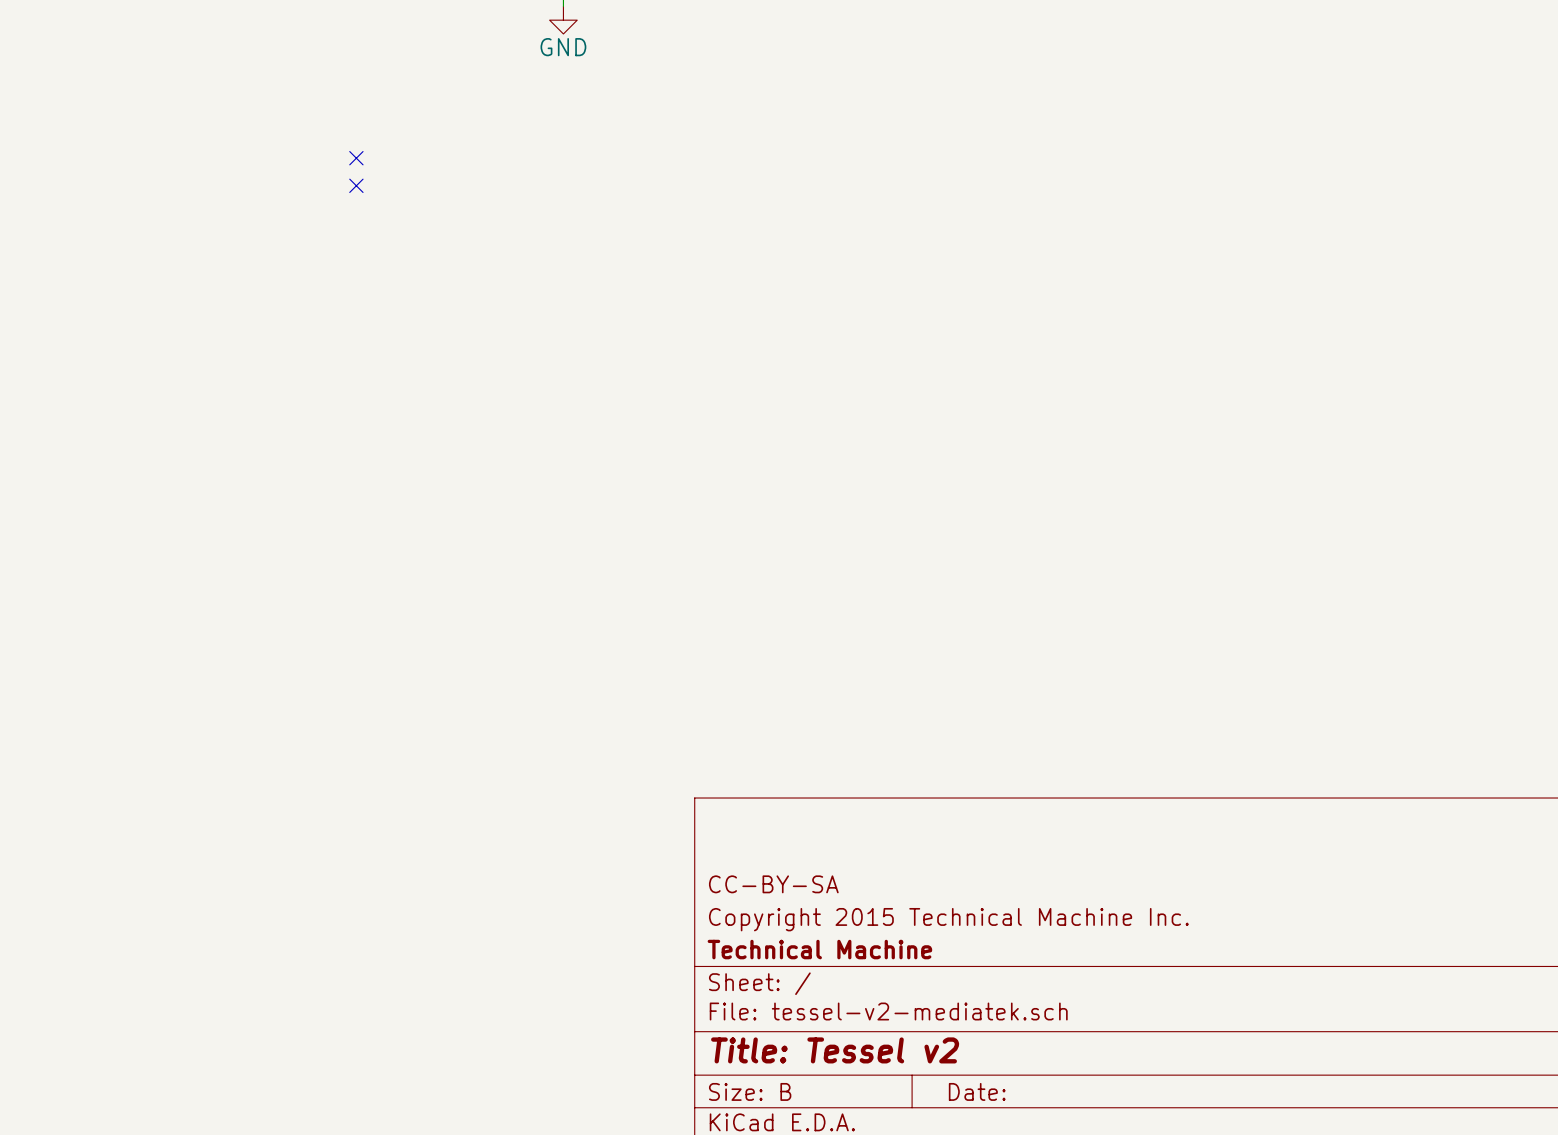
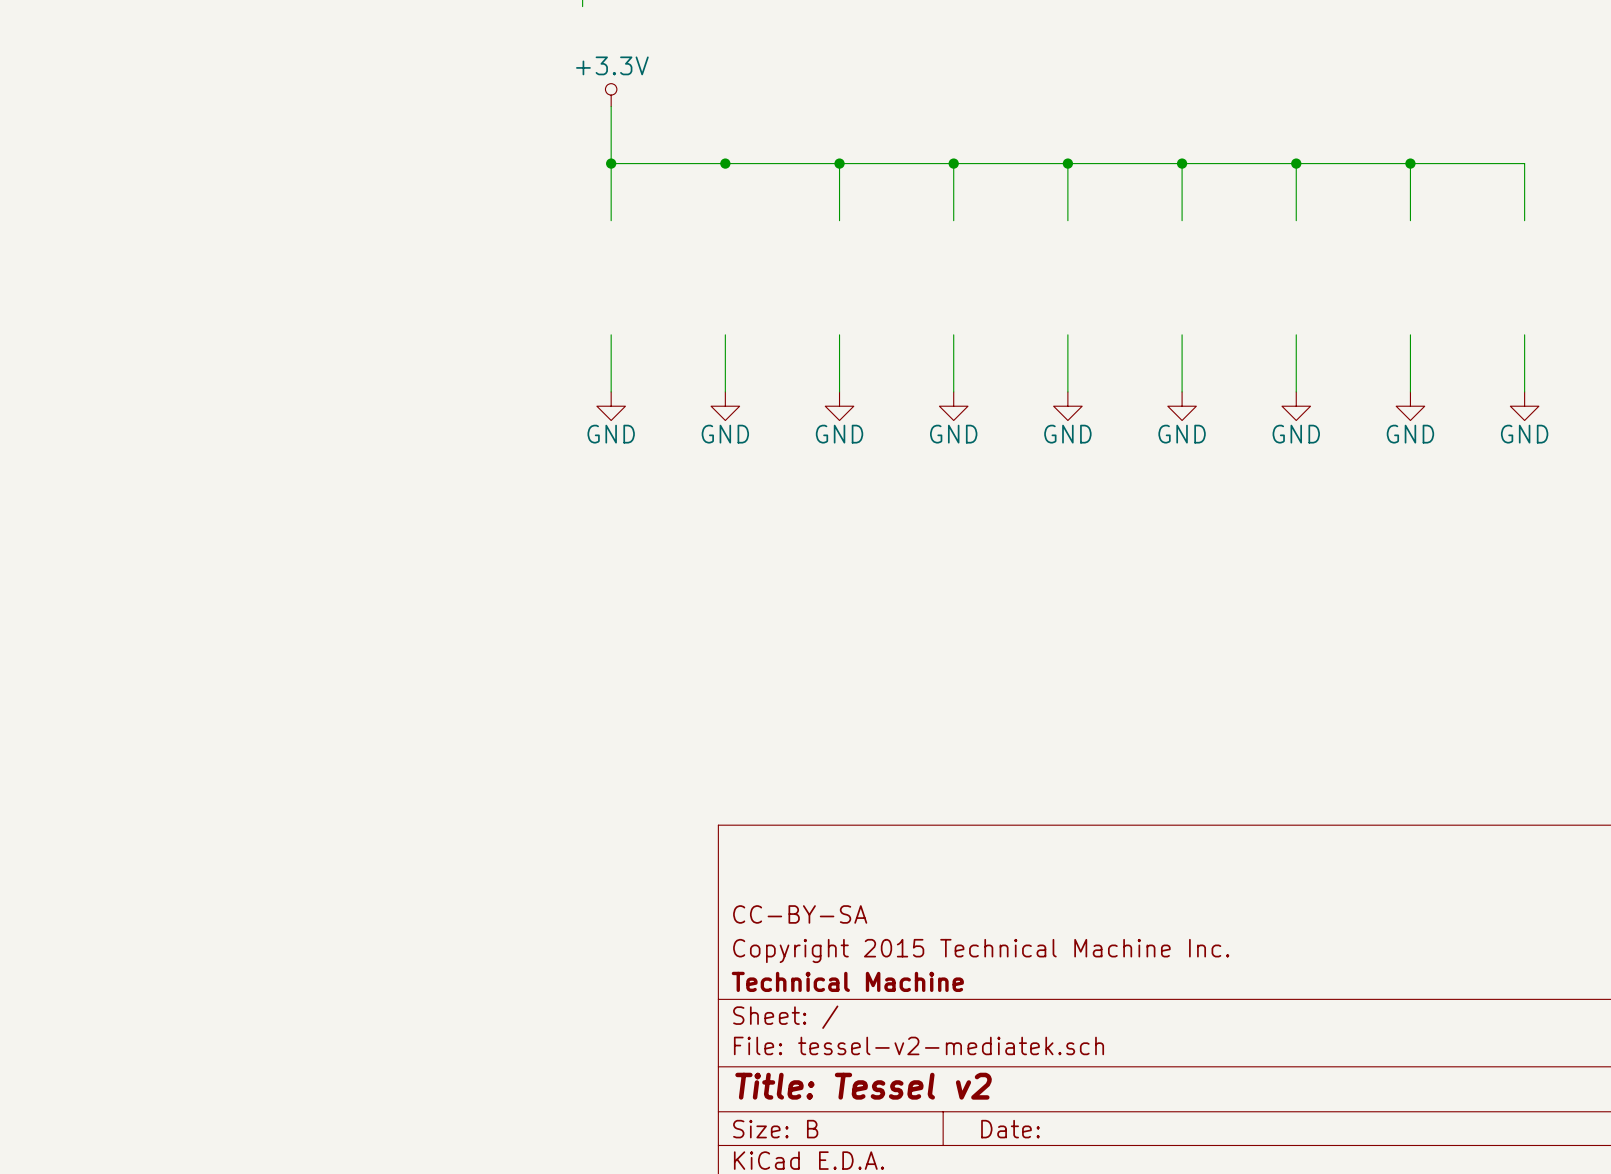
power symbol: GND (563, 20) -> none
power symbol: none -> +3.3V (611, 95)
wire: none -> (611, 106) (611, 220)
no-connect mark: (356, 158) -> none
wire: none -> (611, 163) (1524, 163) (1524, 220)
junction: none -> (611, 163)
junction: none -> (725, 163)
wire: none -> (839, 163) (839, 220)
junction: none -> (839, 163)
wire: none -> (953, 163) (953, 220)
junction: none -> (953, 163)
wire: none -> (1067, 163) (1067, 220)
junction: none -> (1067, 163)
wire: none -> (1182, 163) (1182, 220)
junction: none -> (1182, 163)
wire: none -> (1296, 163) (1296, 220)
junction: none -> (1296, 163)
wire: none -> (1410, 163) (1410, 220)
junction: none -> (1410, 163)
no-connect mark: (356, 185) -> none
wire: none -> (611, 334) (611, 391)
wire: none -> (725, 334) (725, 391)
wire: none -> (839, 334) (839, 391)
wire: none -> (953, 334) (953, 391)
wire: none -> (1067, 334) (1067, 391)
wire: none -> (1182, 334) (1182, 391)
wire: none -> (1296, 334) (1296, 391)
wire: none -> (1410, 334) (1410, 391)
wire: none -> (1524, 334) (1524, 391)
power symbol: none -> GND (611, 406)
power symbol: none -> GND (725, 406)
power symbol: none -> GND (839, 406)
power symbol: none -> GND (953, 406)
power symbol: none -> GND (1067, 406)
power symbol: none -> GND (1182, 406)
power symbol: none -> GND (1296, 406)
power symbol: none -> GND (1410, 406)
power symbol: none -> GND (1524, 406)

